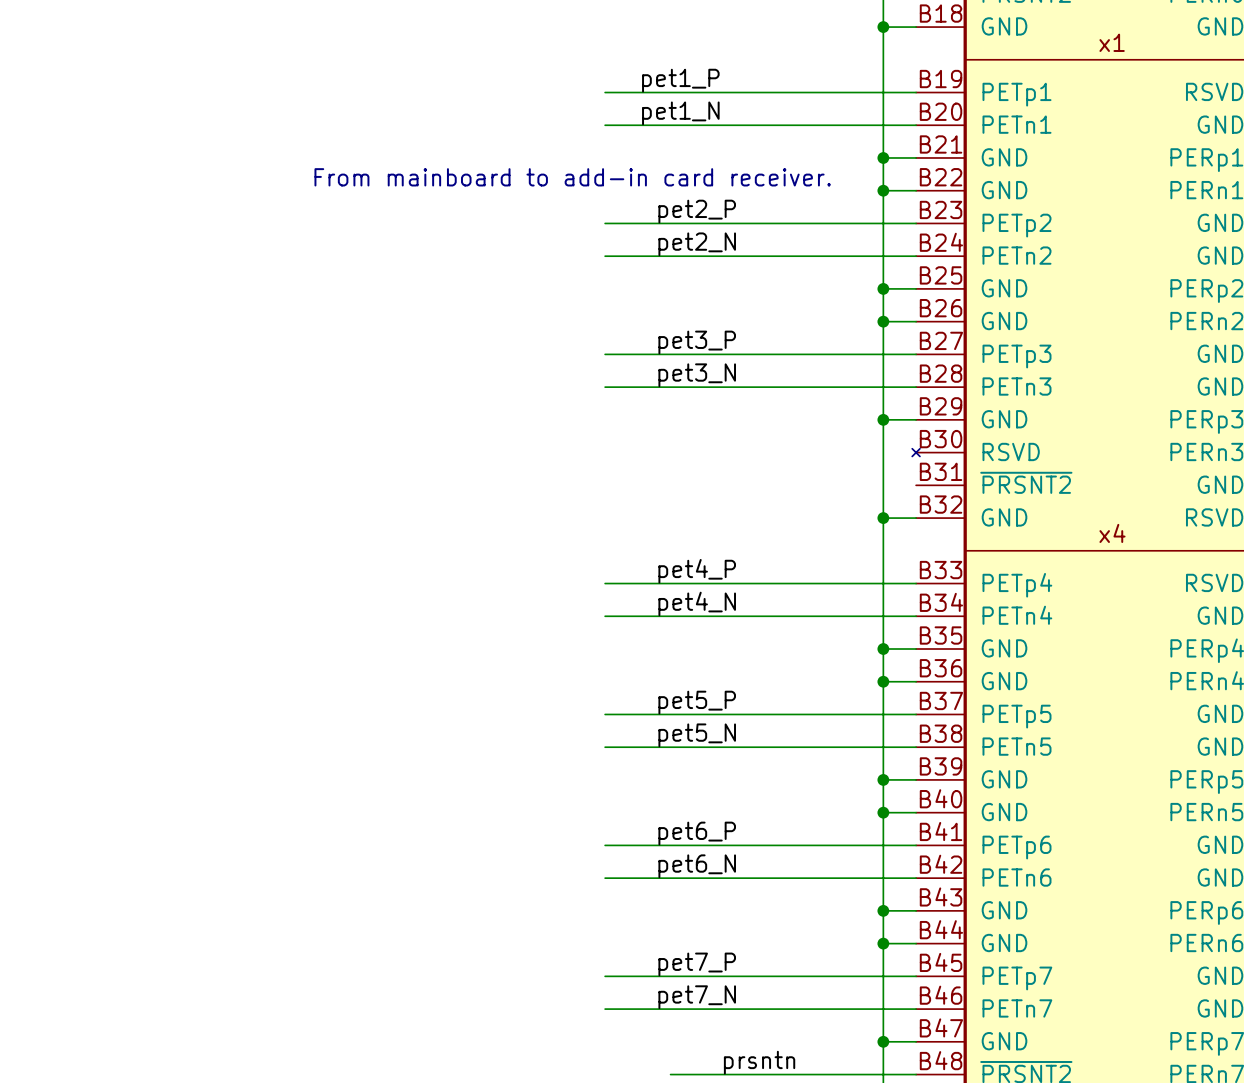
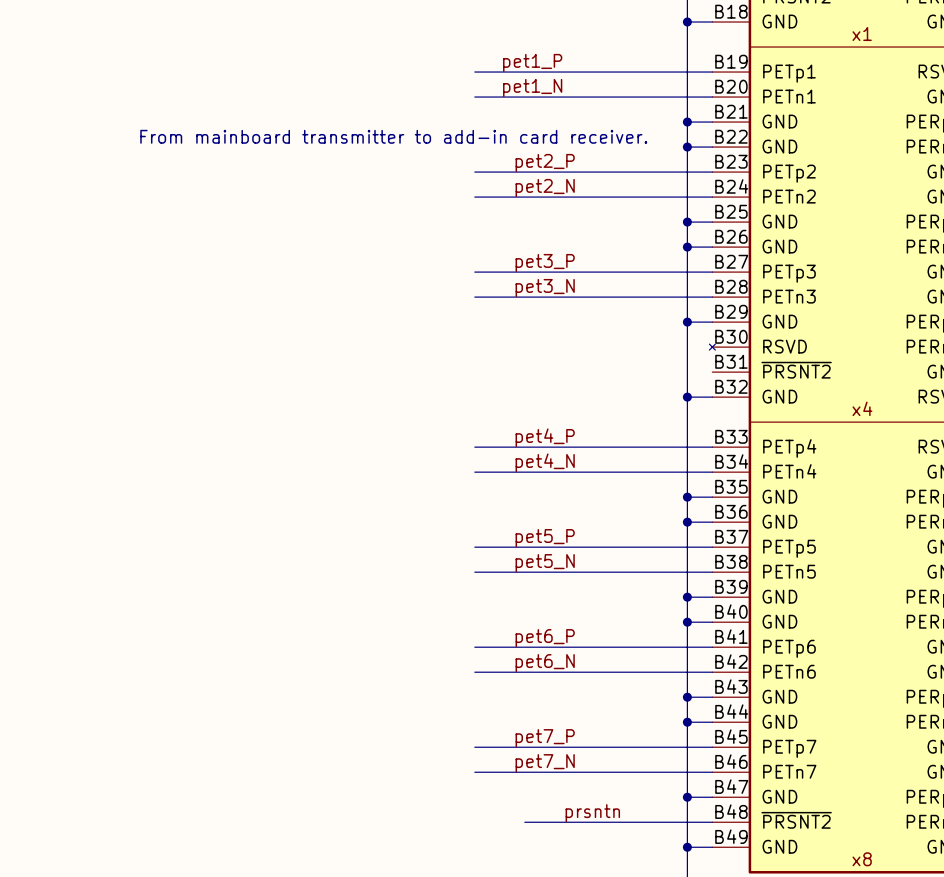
text: From mainboard to add-in card receiver. (572, 177) -> From mainboard transmitter to add-in card receiver. (393, 136)

